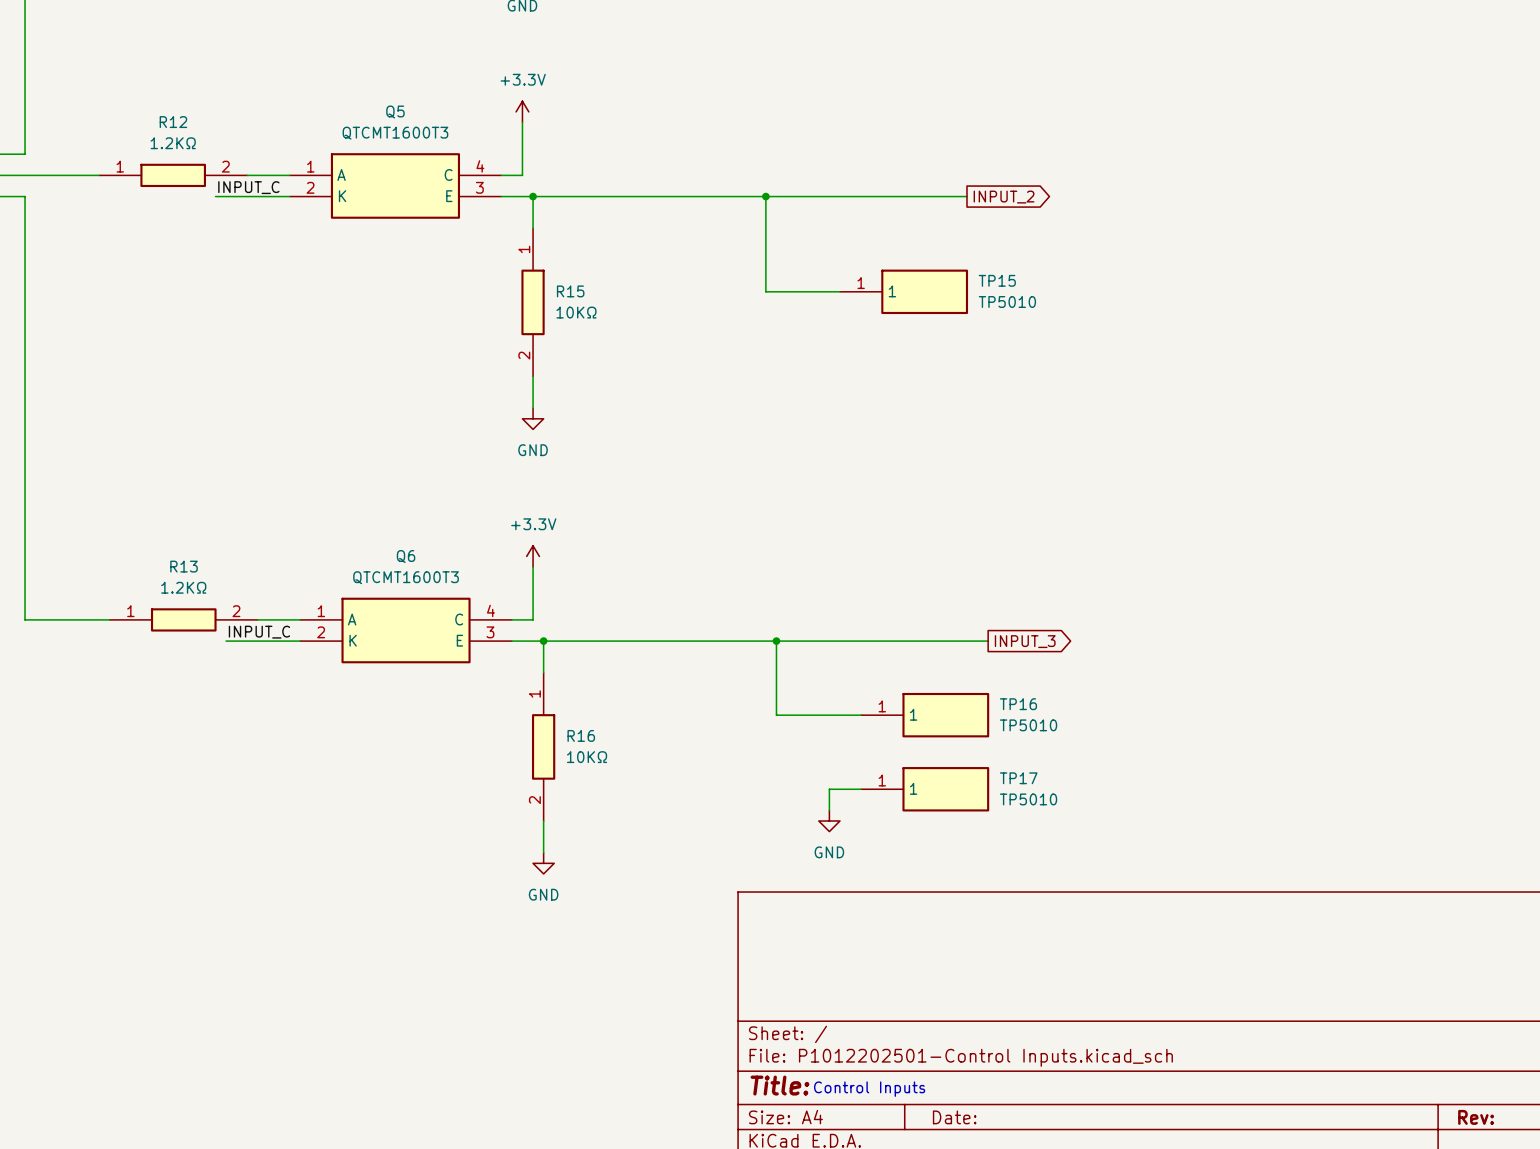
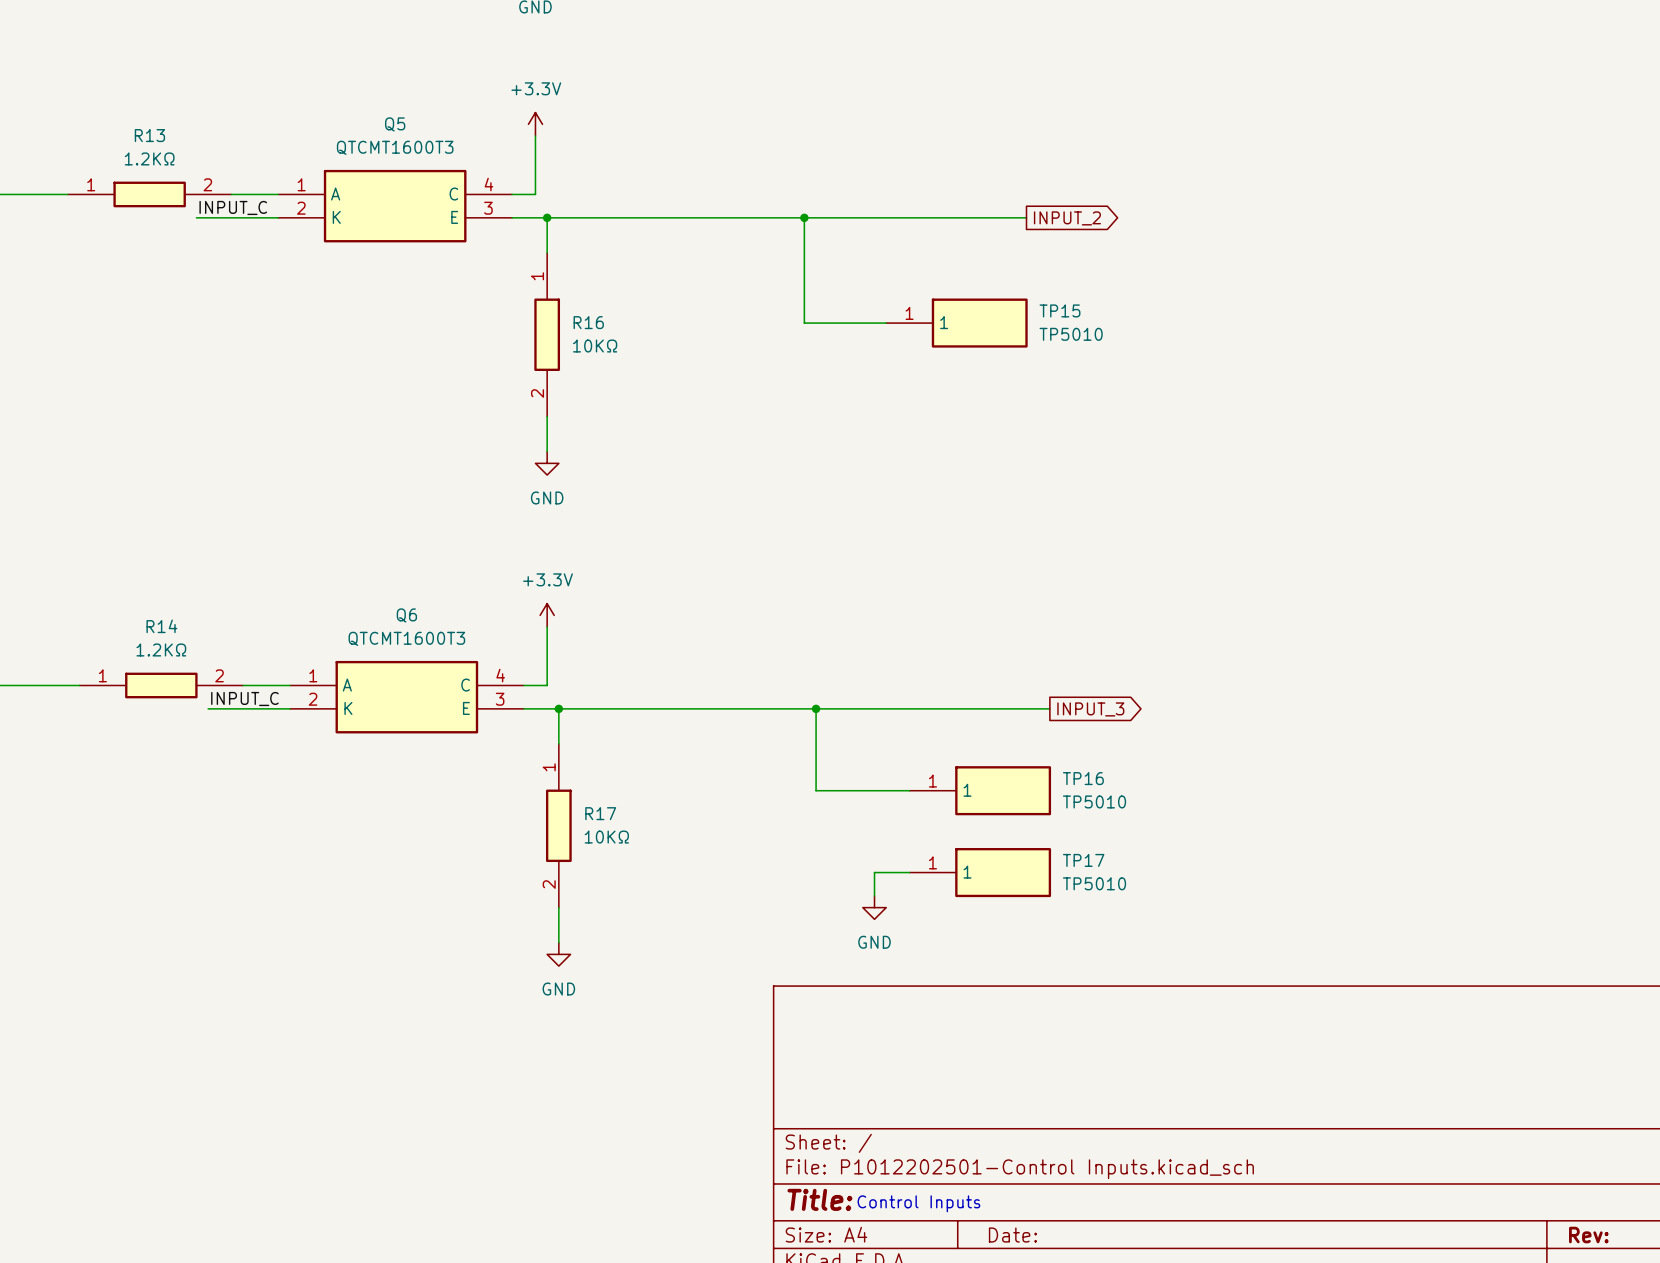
R12 name: R12 (173, 122) -> R13 (149, 135)
R15 name: R15 (570, 291) -> R16 (588, 322)
R13 name: R13 (184, 566) -> R14 (161, 626)
R16 name: R16 (581, 735) -> R17 (600, 813)

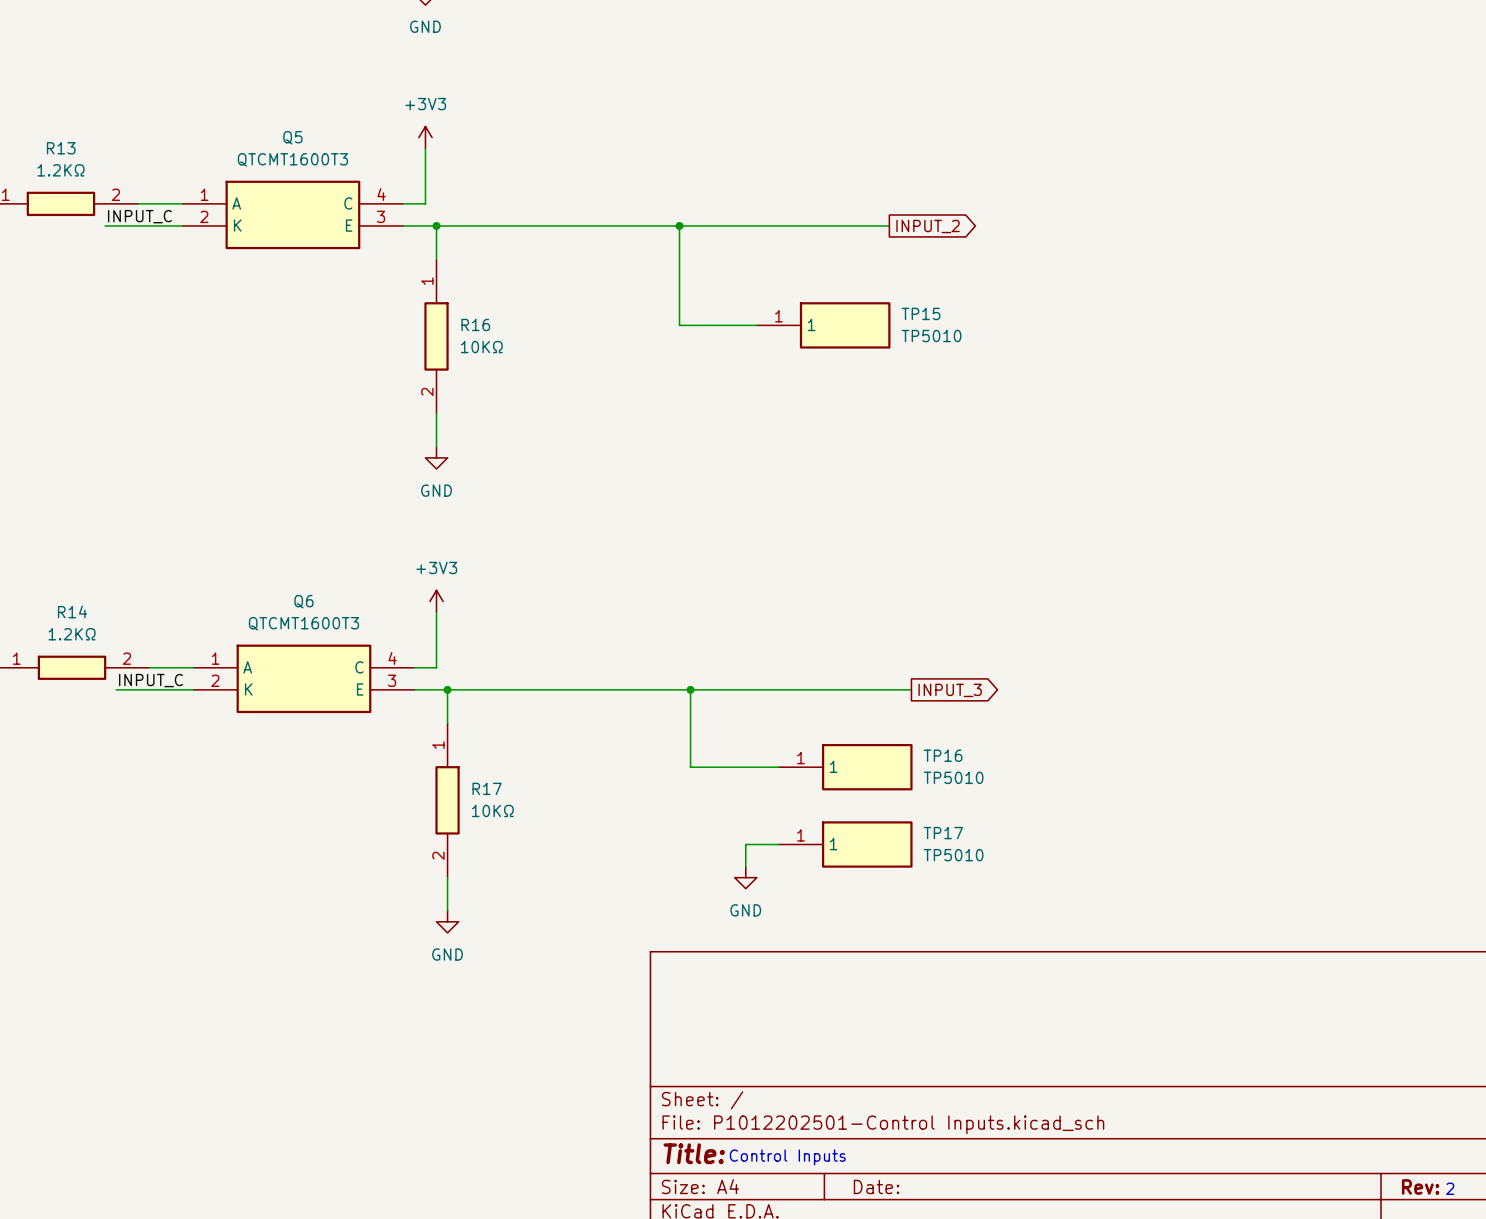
power symbol: +3.3V (535, 124) -> +3V3 (425, 137)
power symbol: +3.3V (547, 615) -> +3V3 (436, 601)
text: none -> 2 (1450, 1188)

